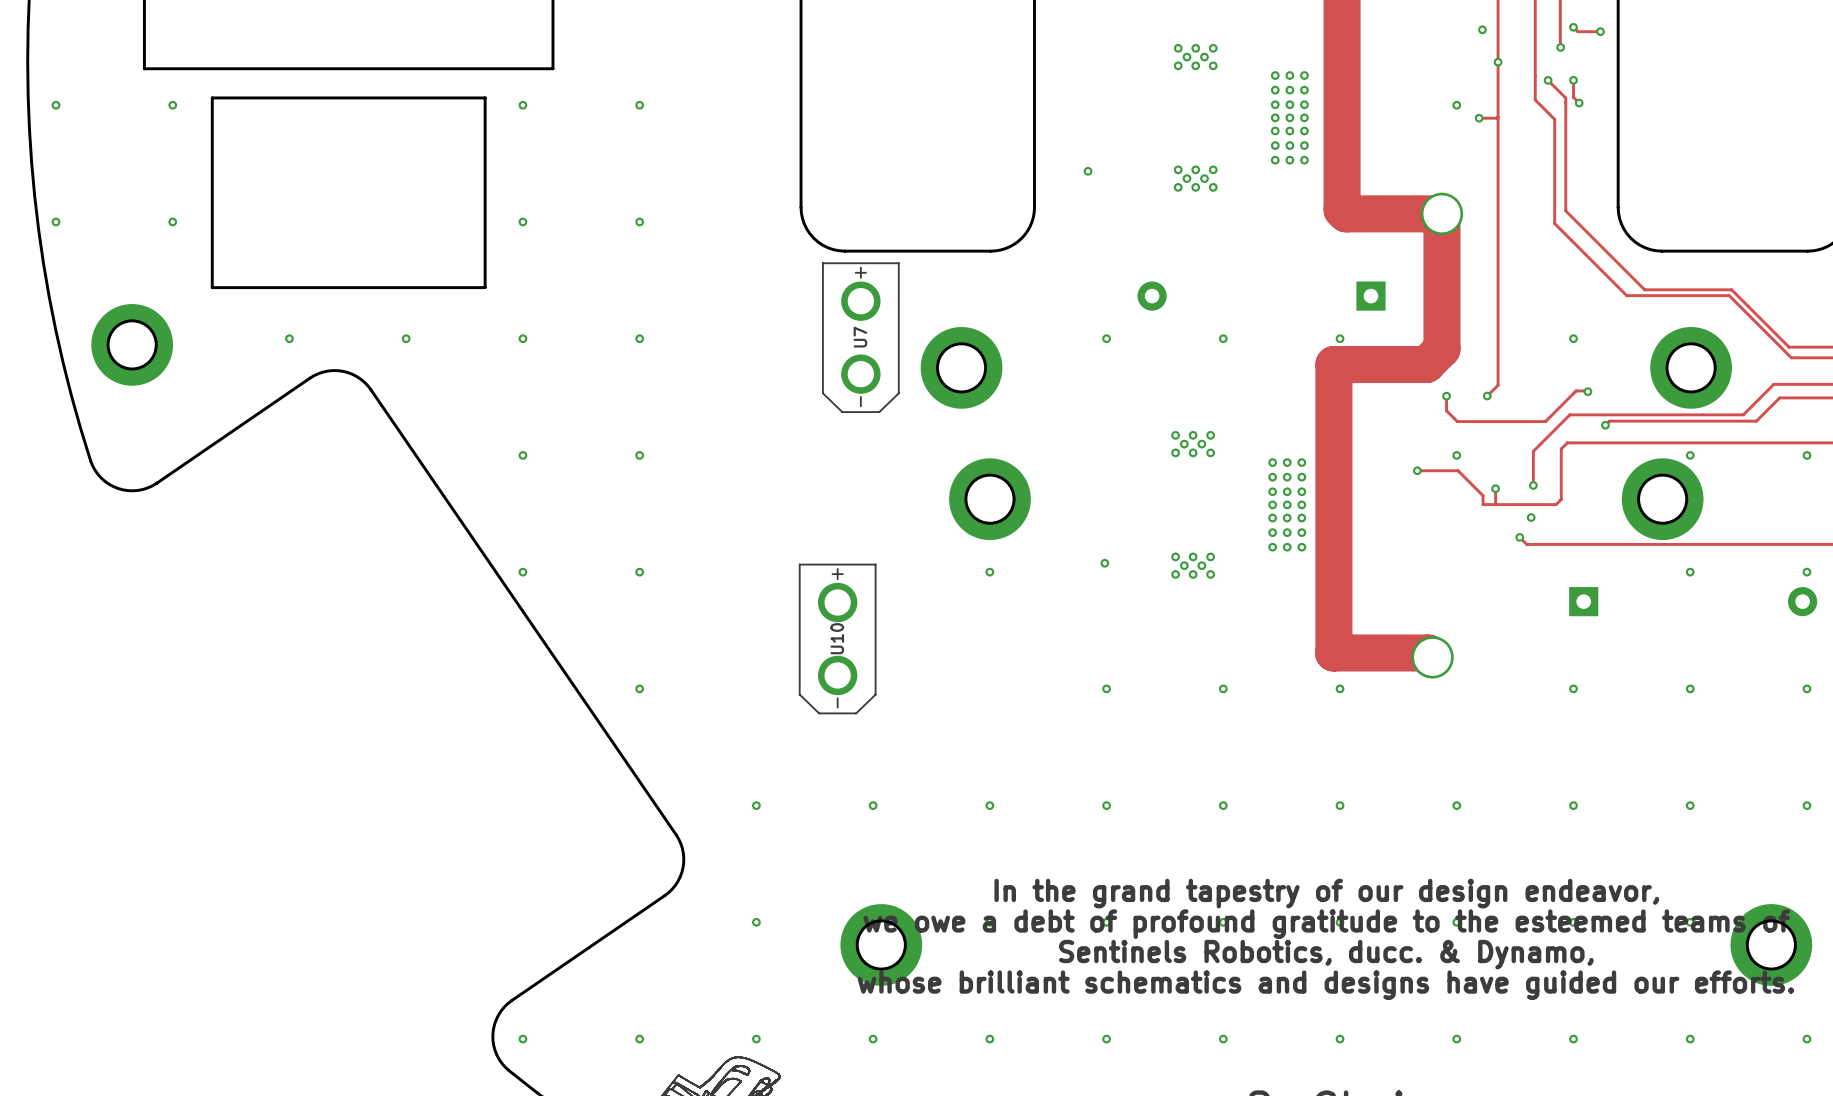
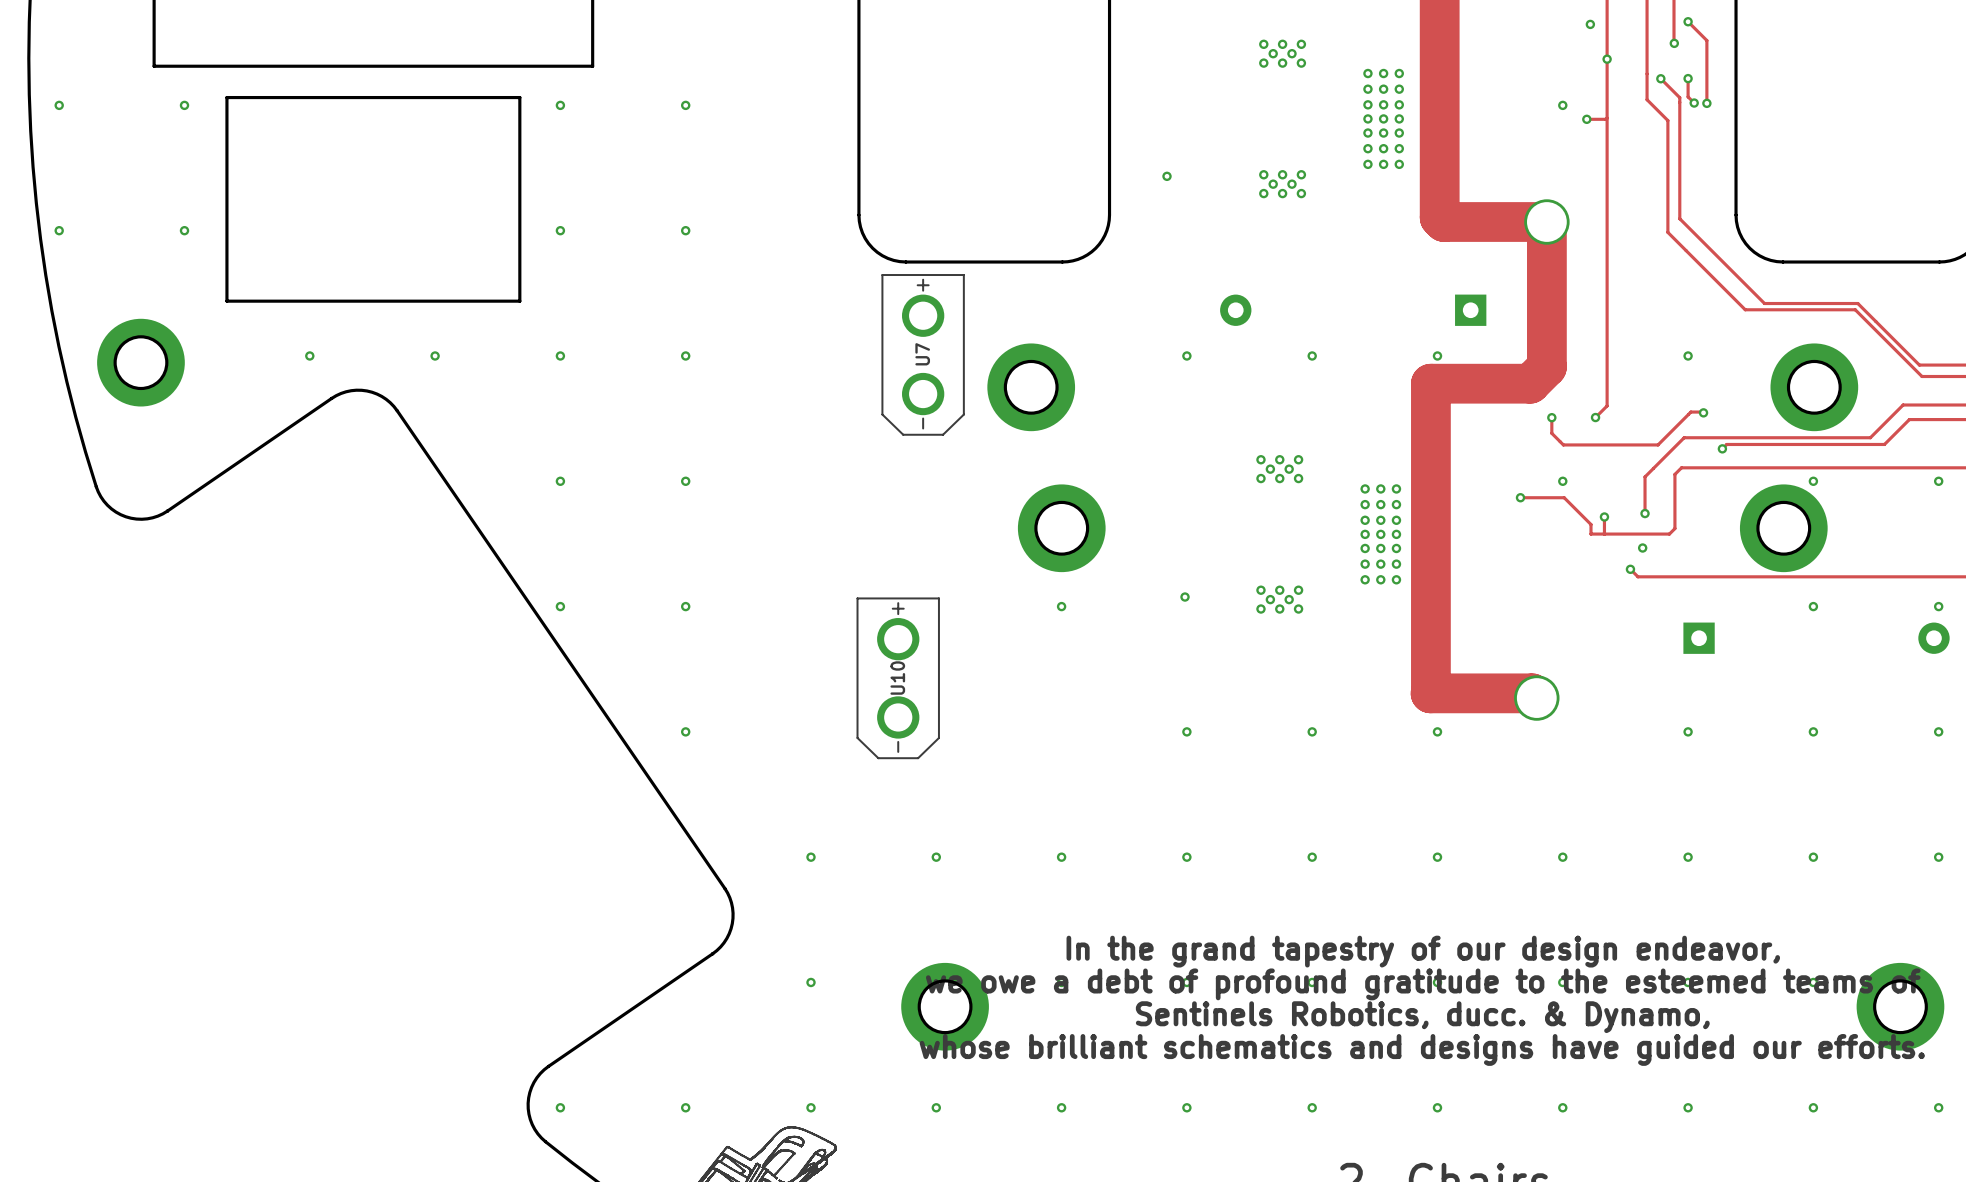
track: (1577, 31) (1600, 31) -> (1692, 26) (1706, 40) (1706, 103)
via position: (1600, 31) -> (1706, 103)

